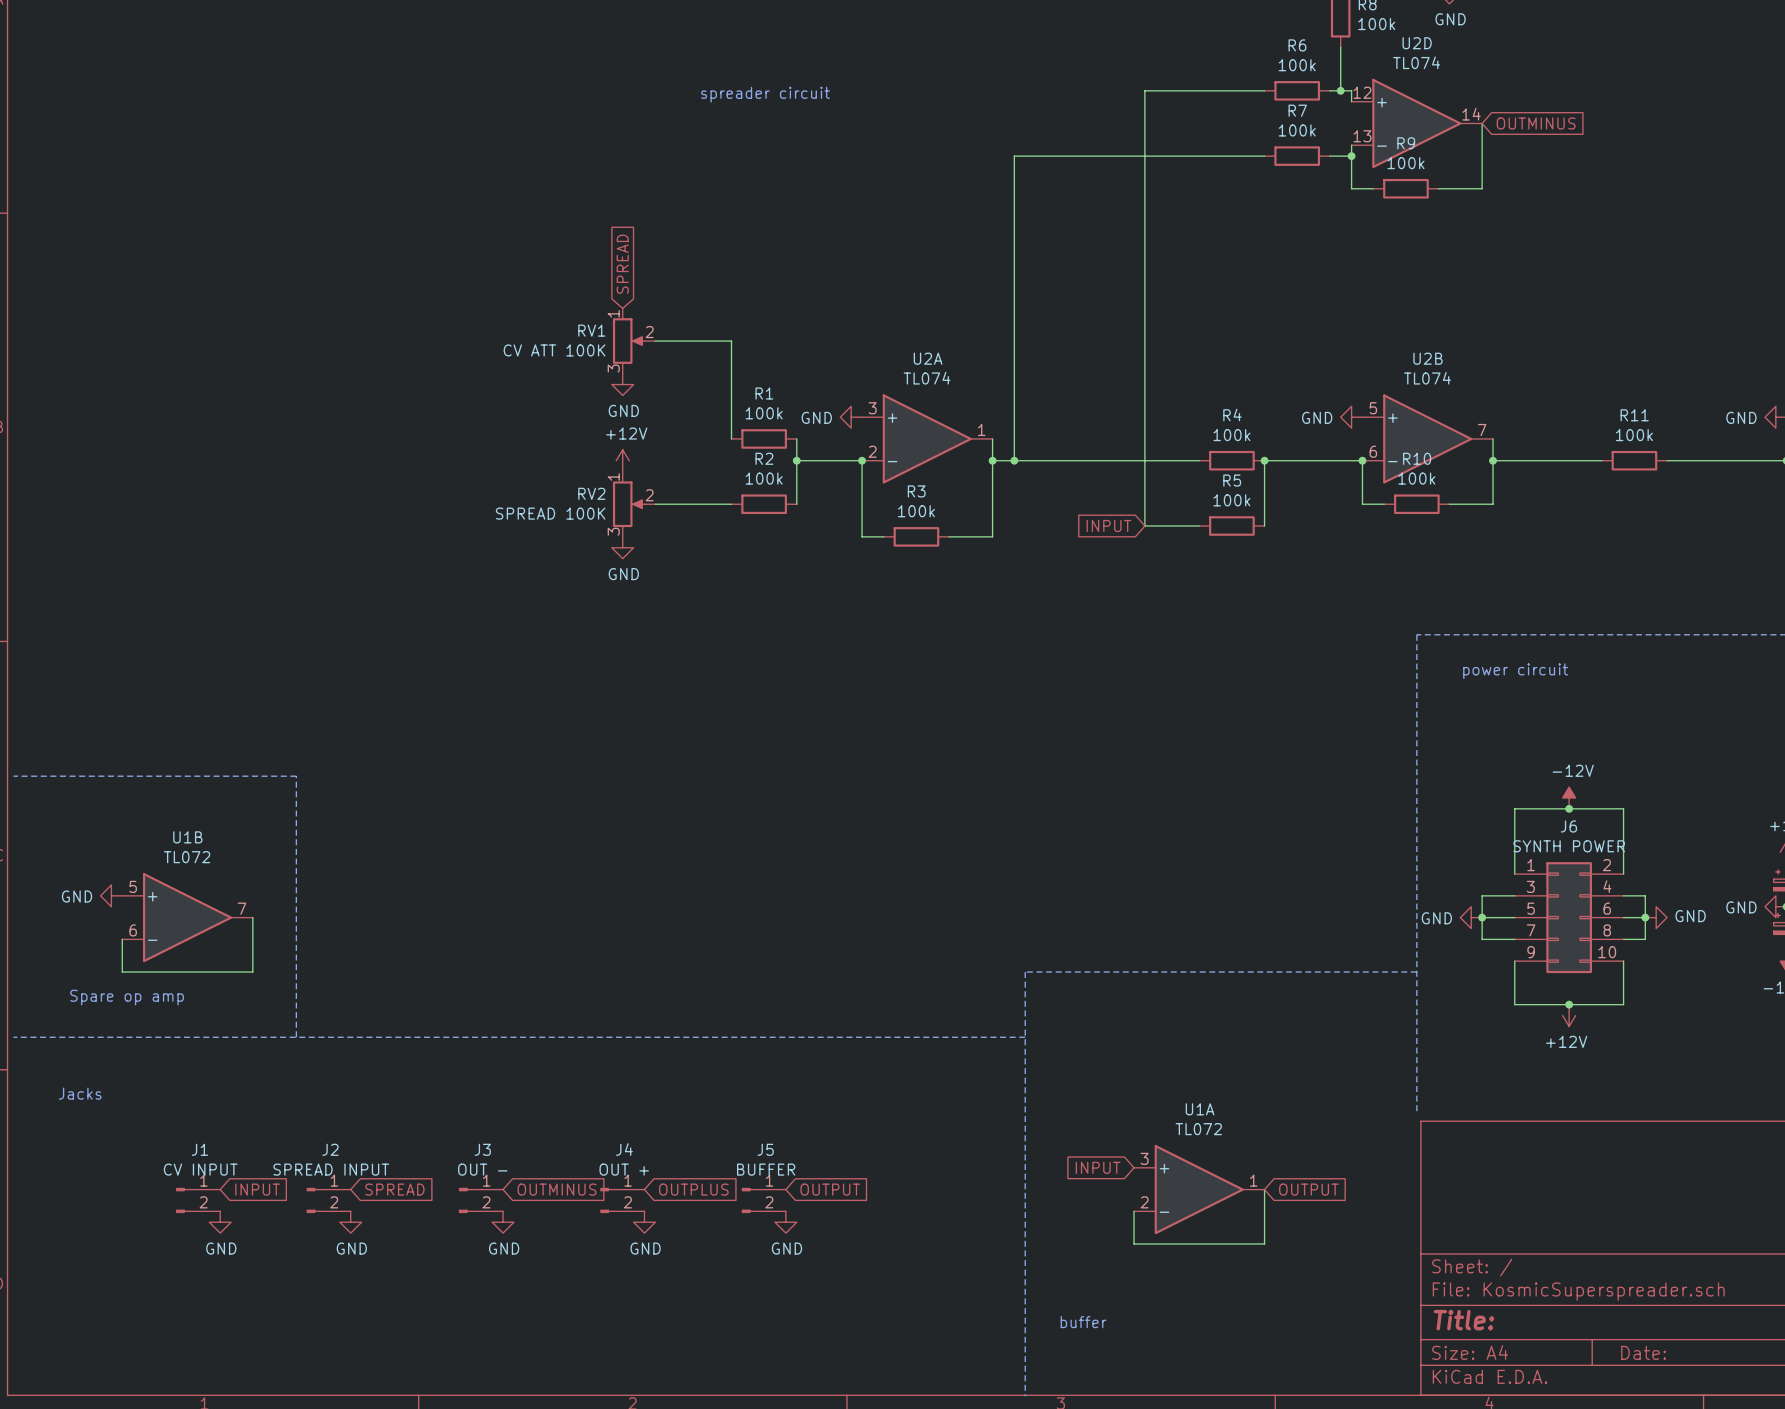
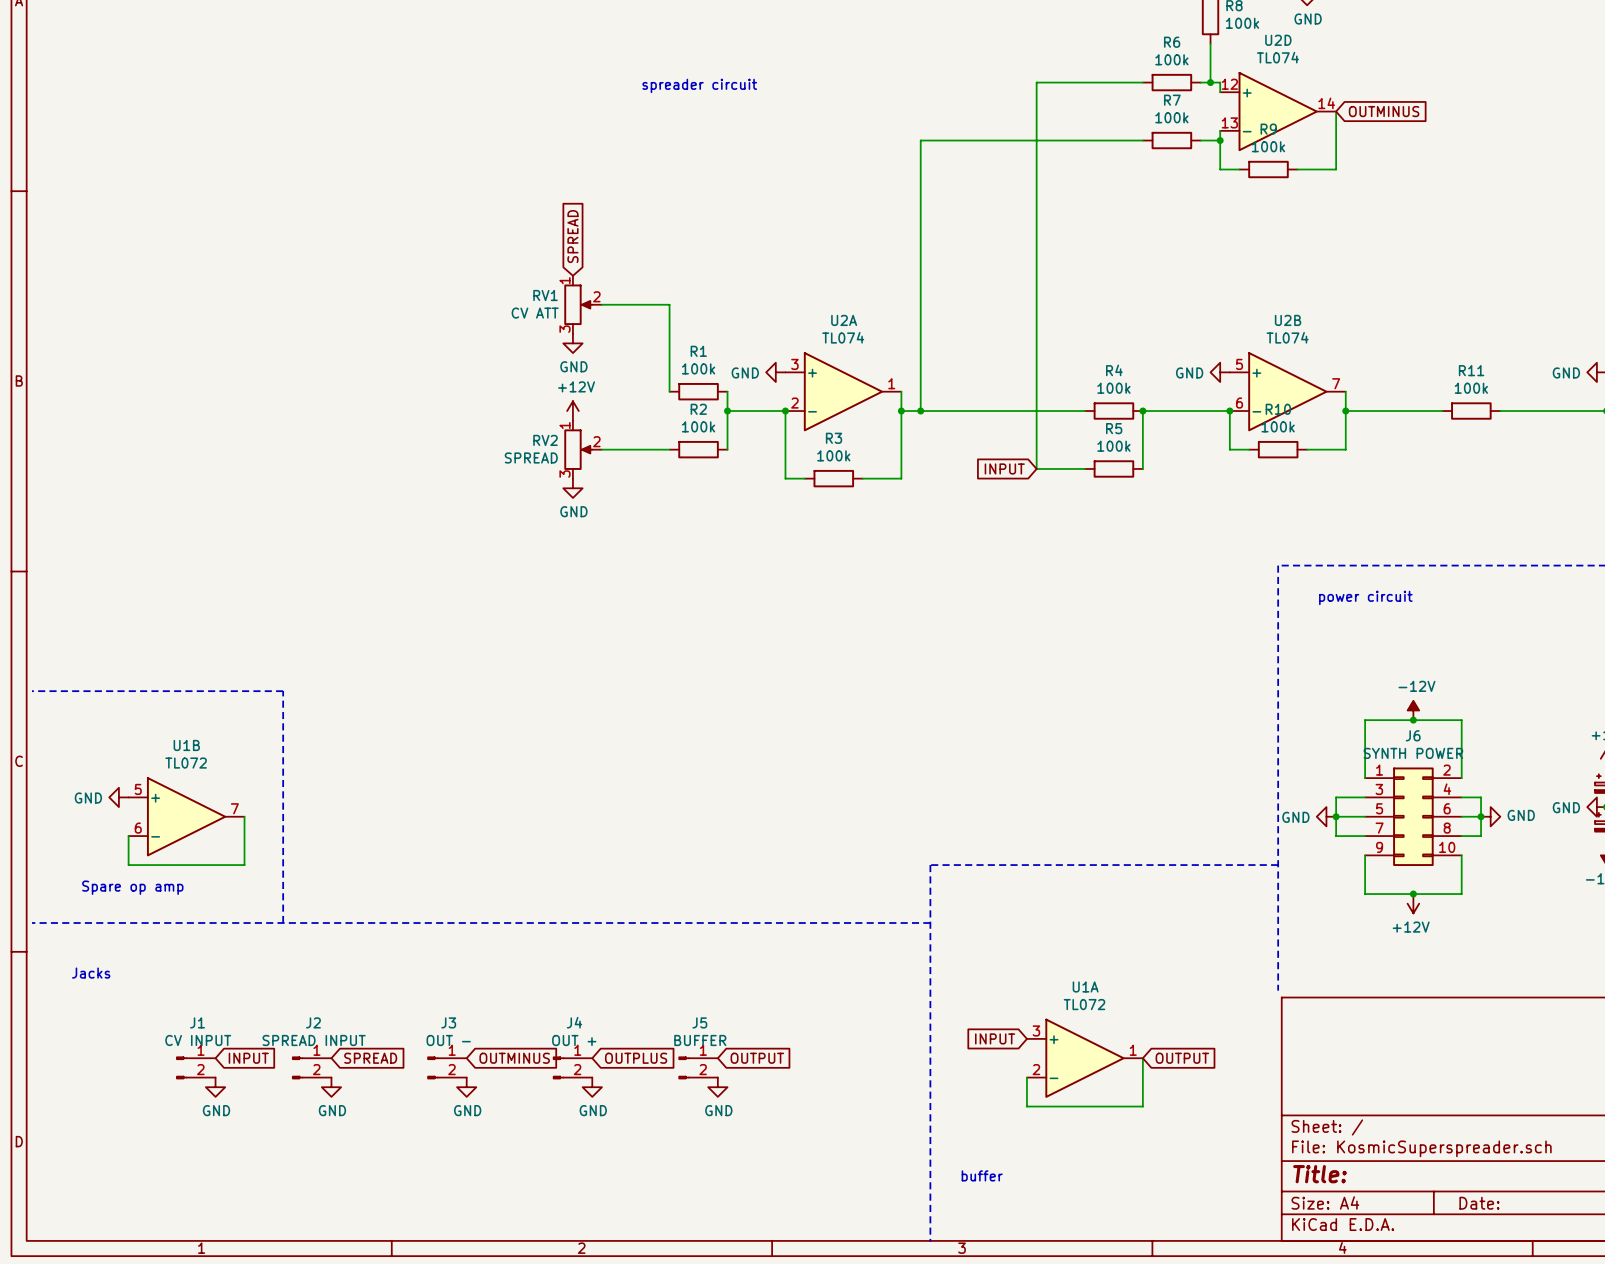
RV1 value: CV ATT 100K (554, 350) -> CV ATT (535, 313)
RV2 value: SPREAD 100K (550, 513) -> SPREAD (531, 457)

